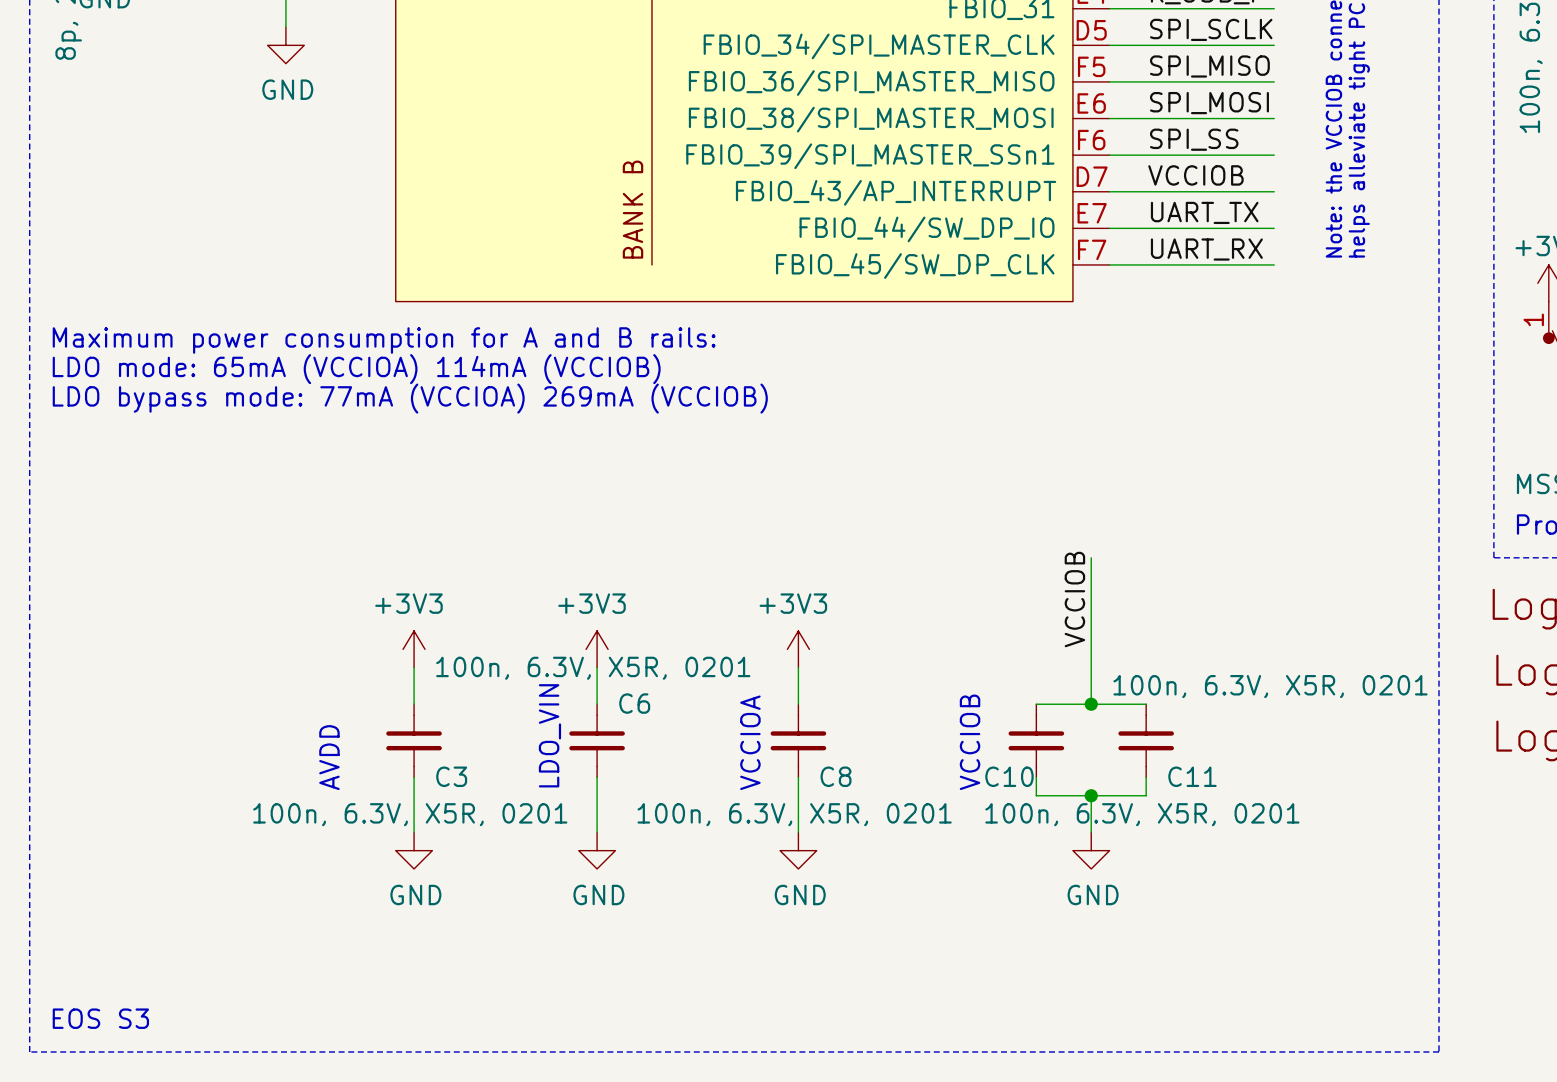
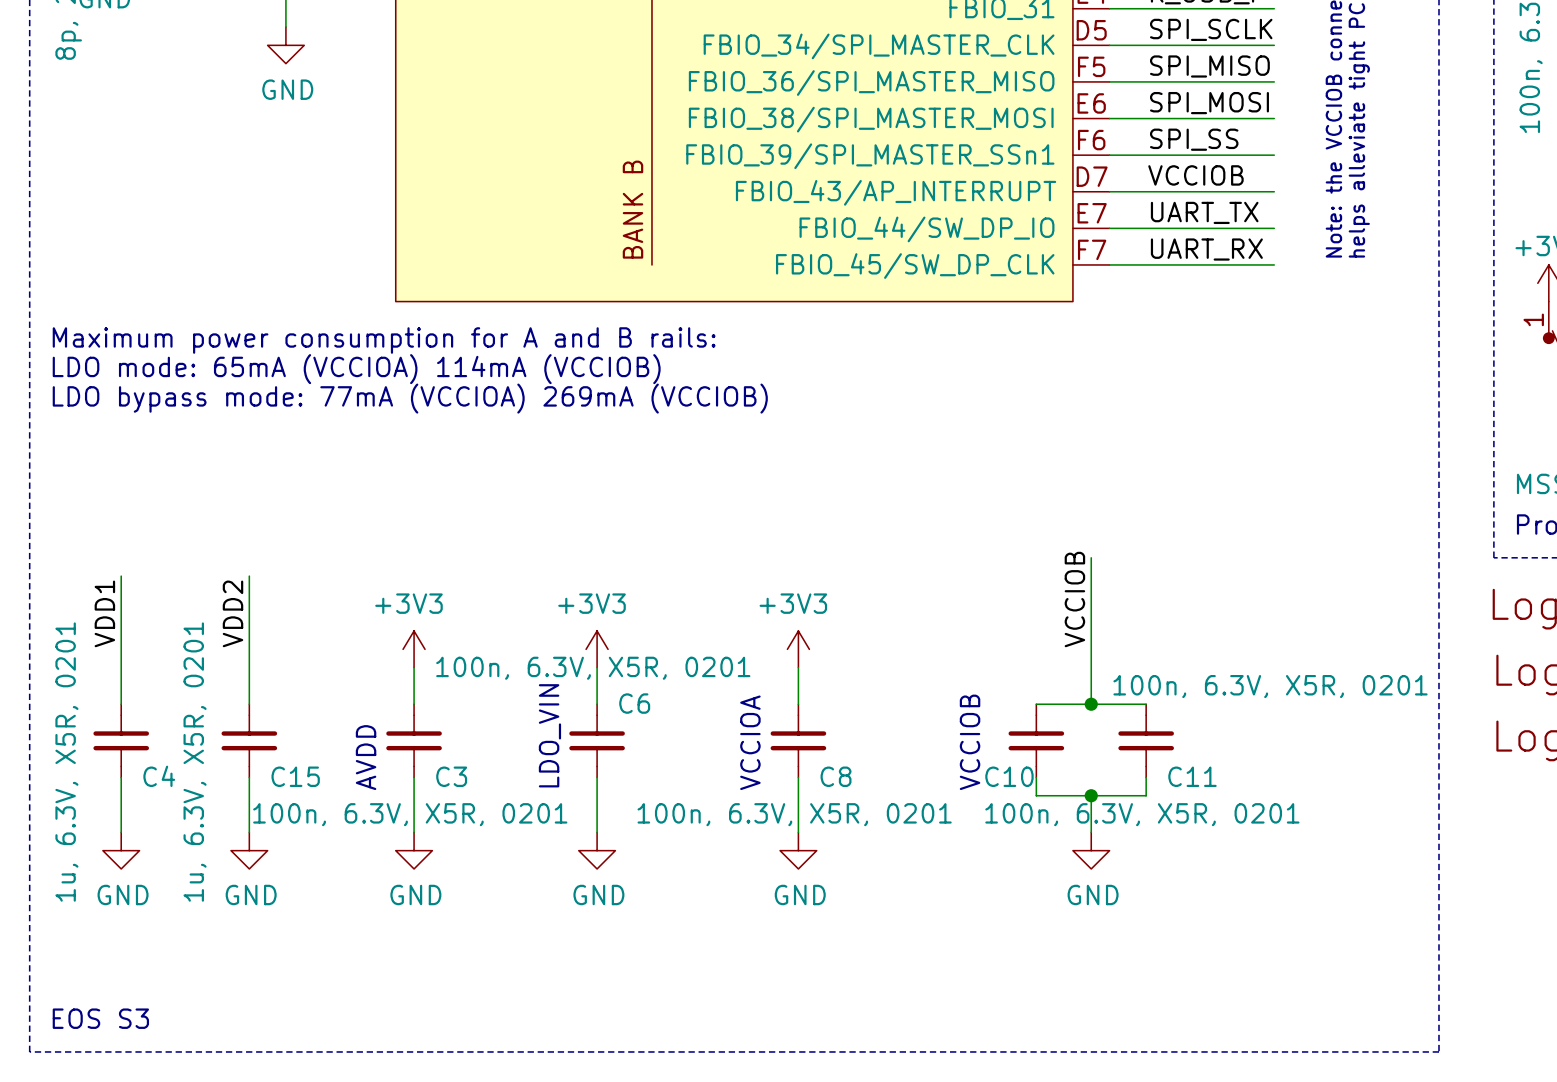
wire: none -> (121, 576) (121, 704)
wire: none -> (249, 576) (249, 704)
label: none -> VDD1 (104, 613)
label: none -> VDD2 (232, 613)
C4: none -> 1u, 6.3V, X5R, 0201 (121, 740)
C15: none -> 1u, 6.3V, X5R, 0201 (249, 740)
text position: AVDD (329, 757) -> AVDD (366, 757)
wire: none -> (121, 777) (121, 832)
wire: none -> (249, 777) (249, 832)
power symbol: none -> GND (121, 850)
power symbol: none -> GND (249, 850)

